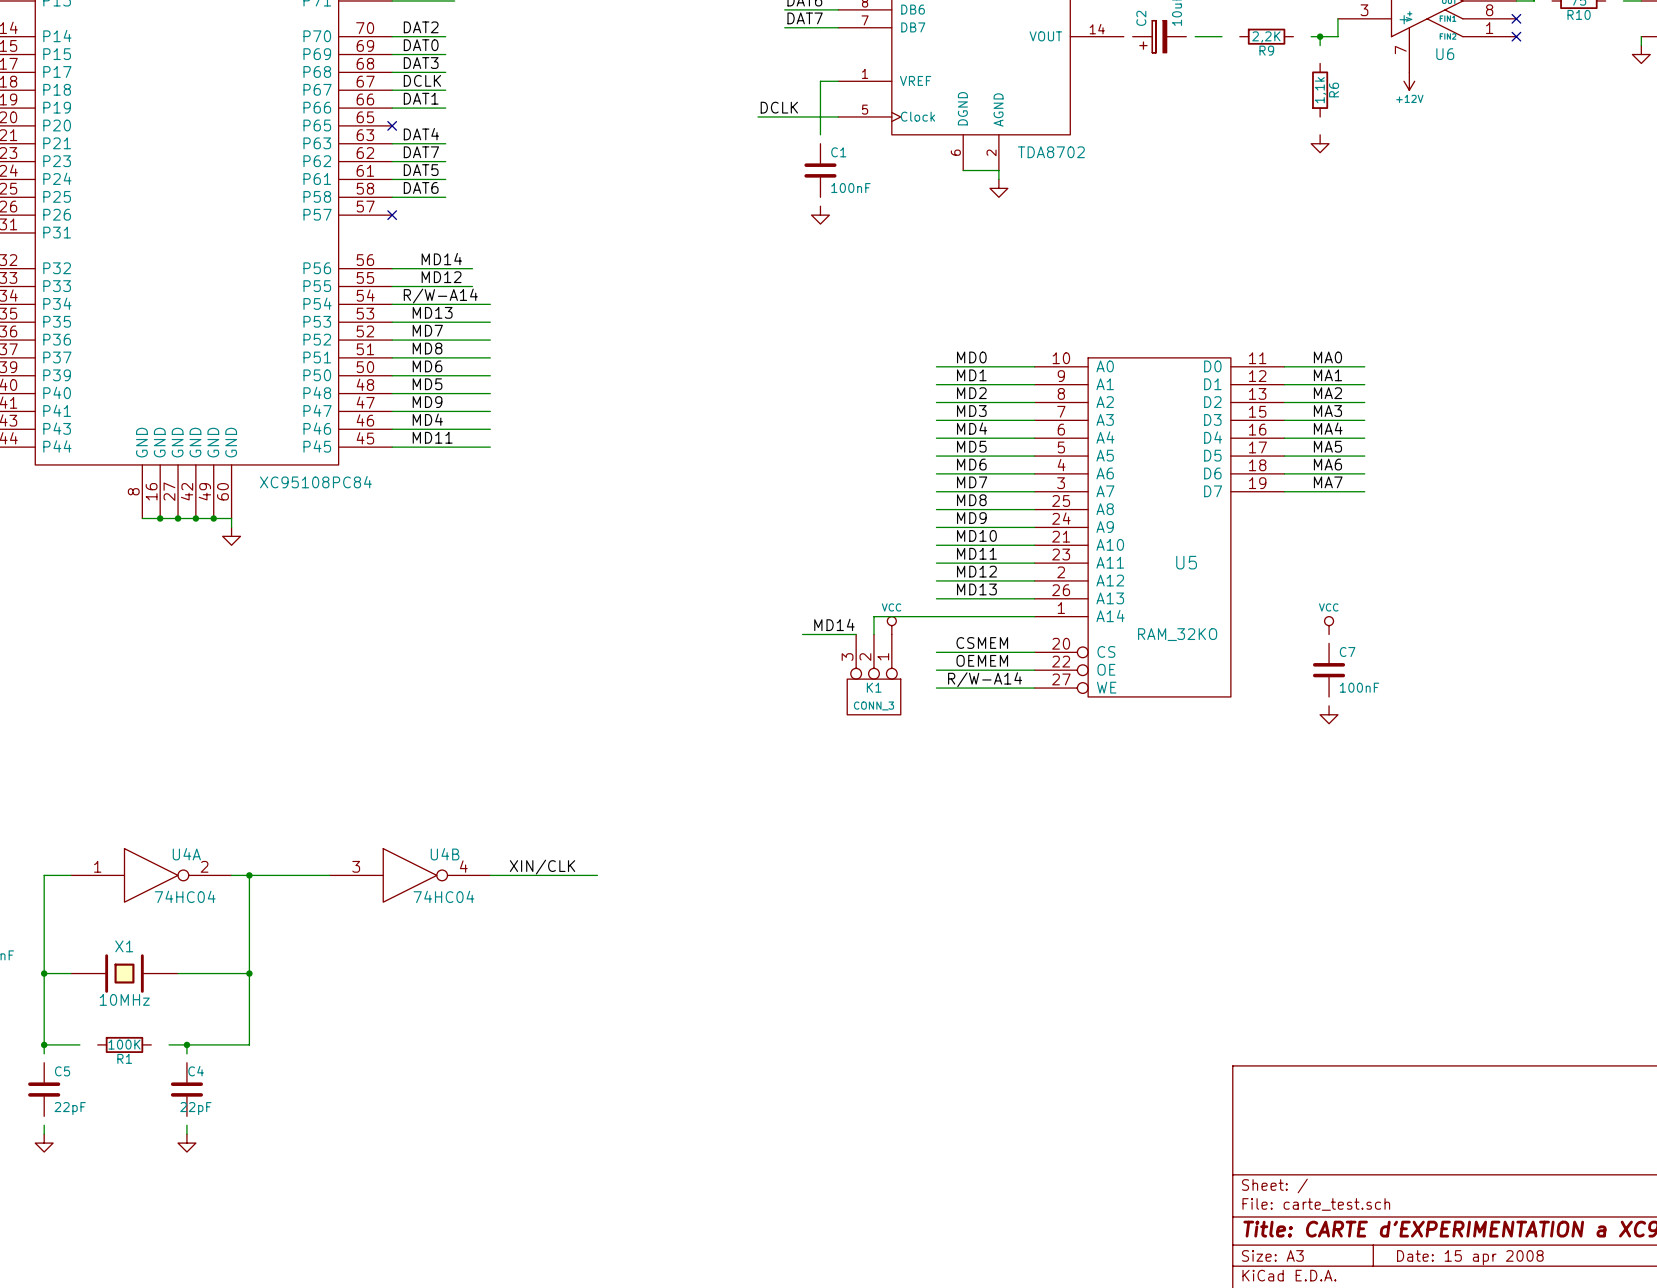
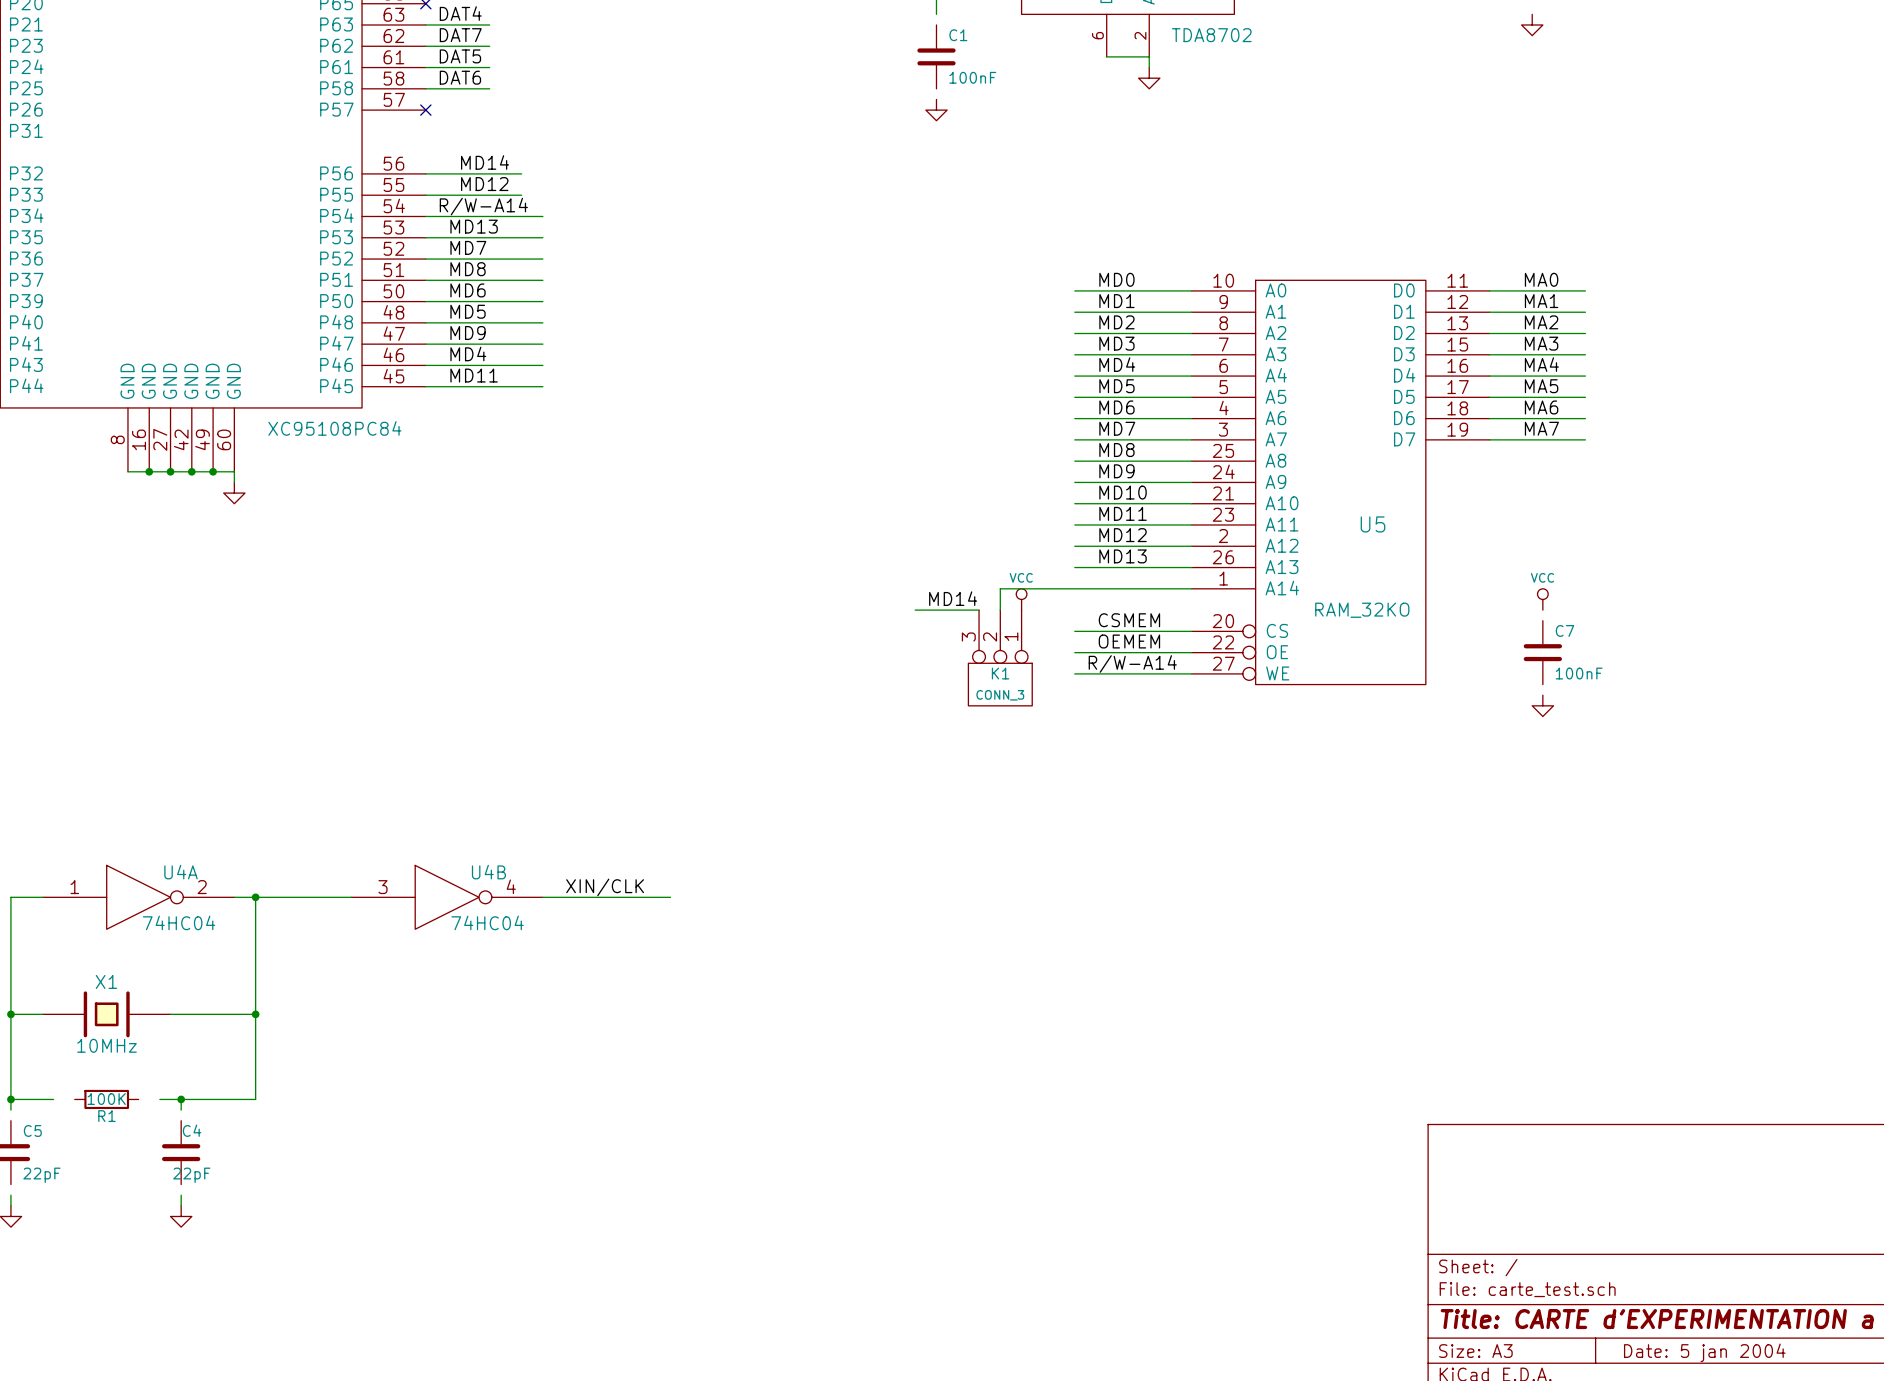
title block: Date: 15 apr 2008 (1470, 1257) -> Date: 5 jan 2004 (1704, 1352)

